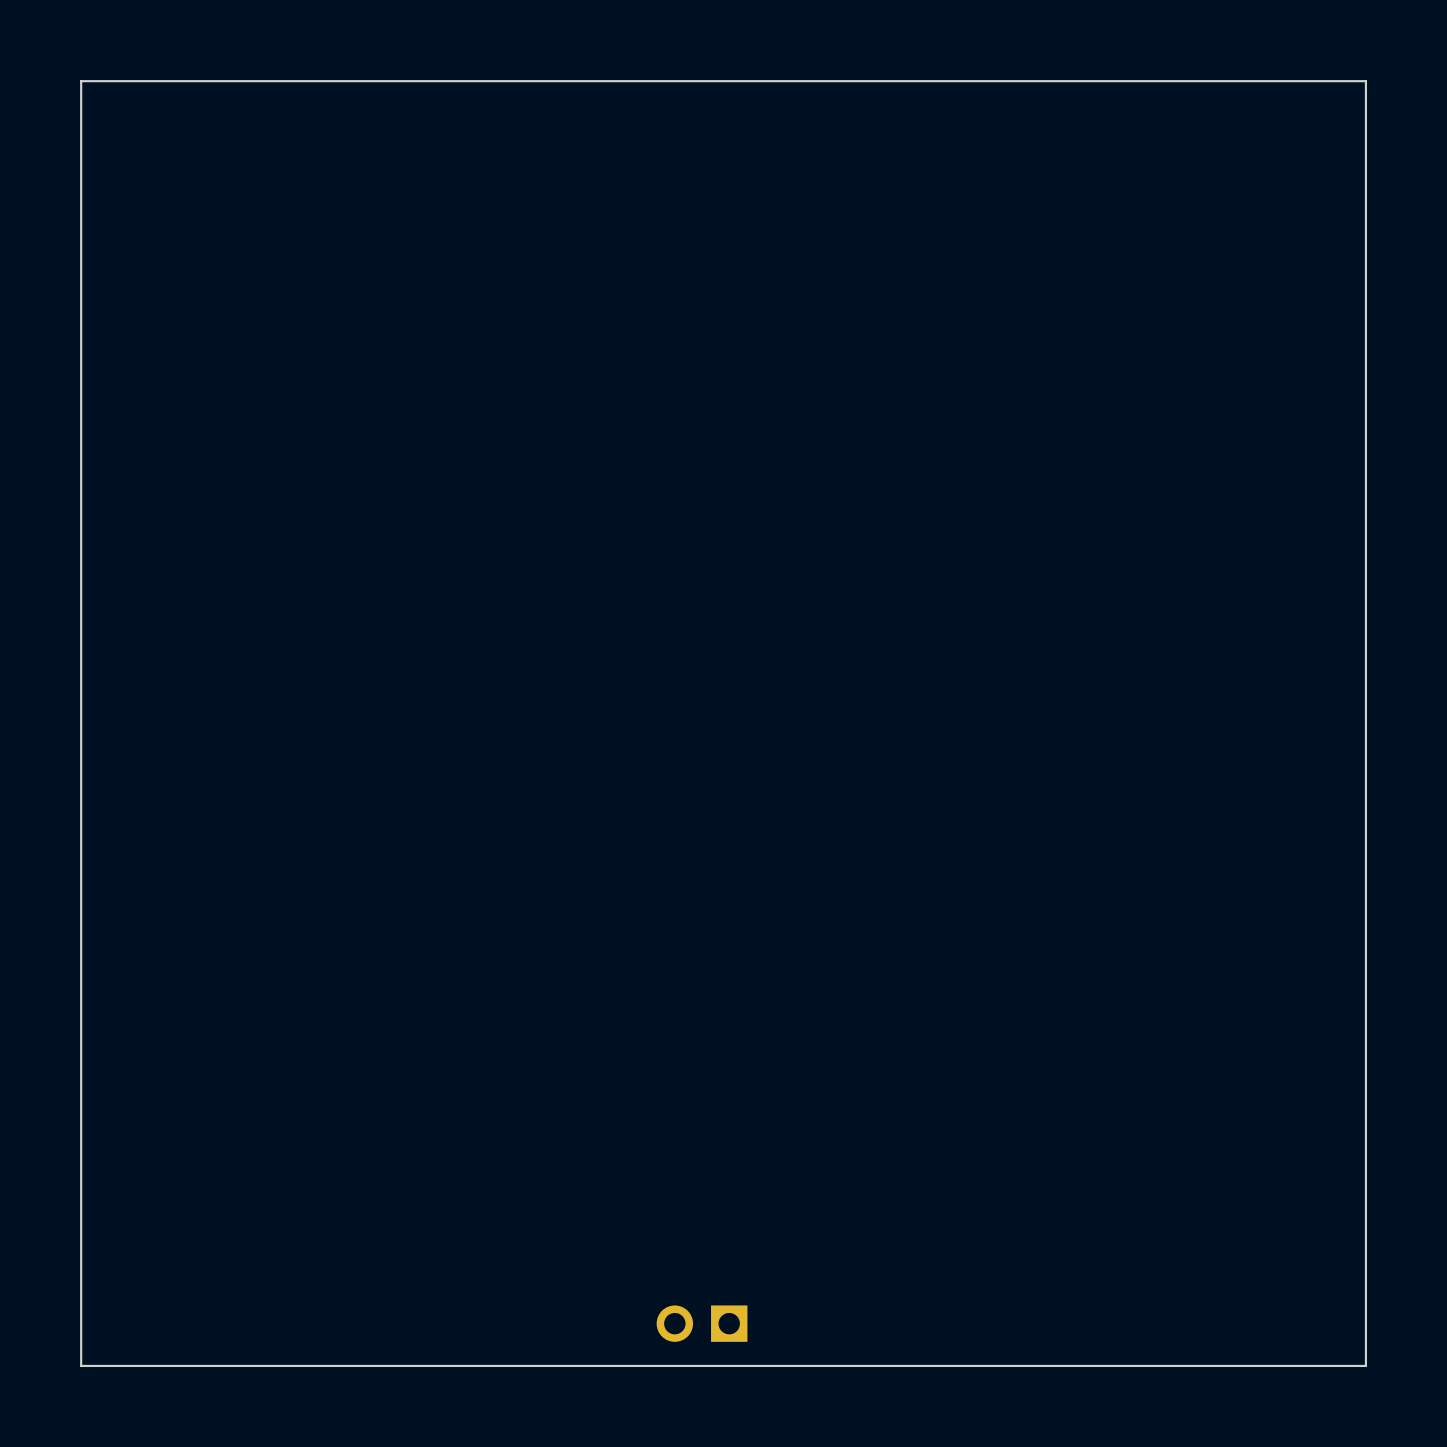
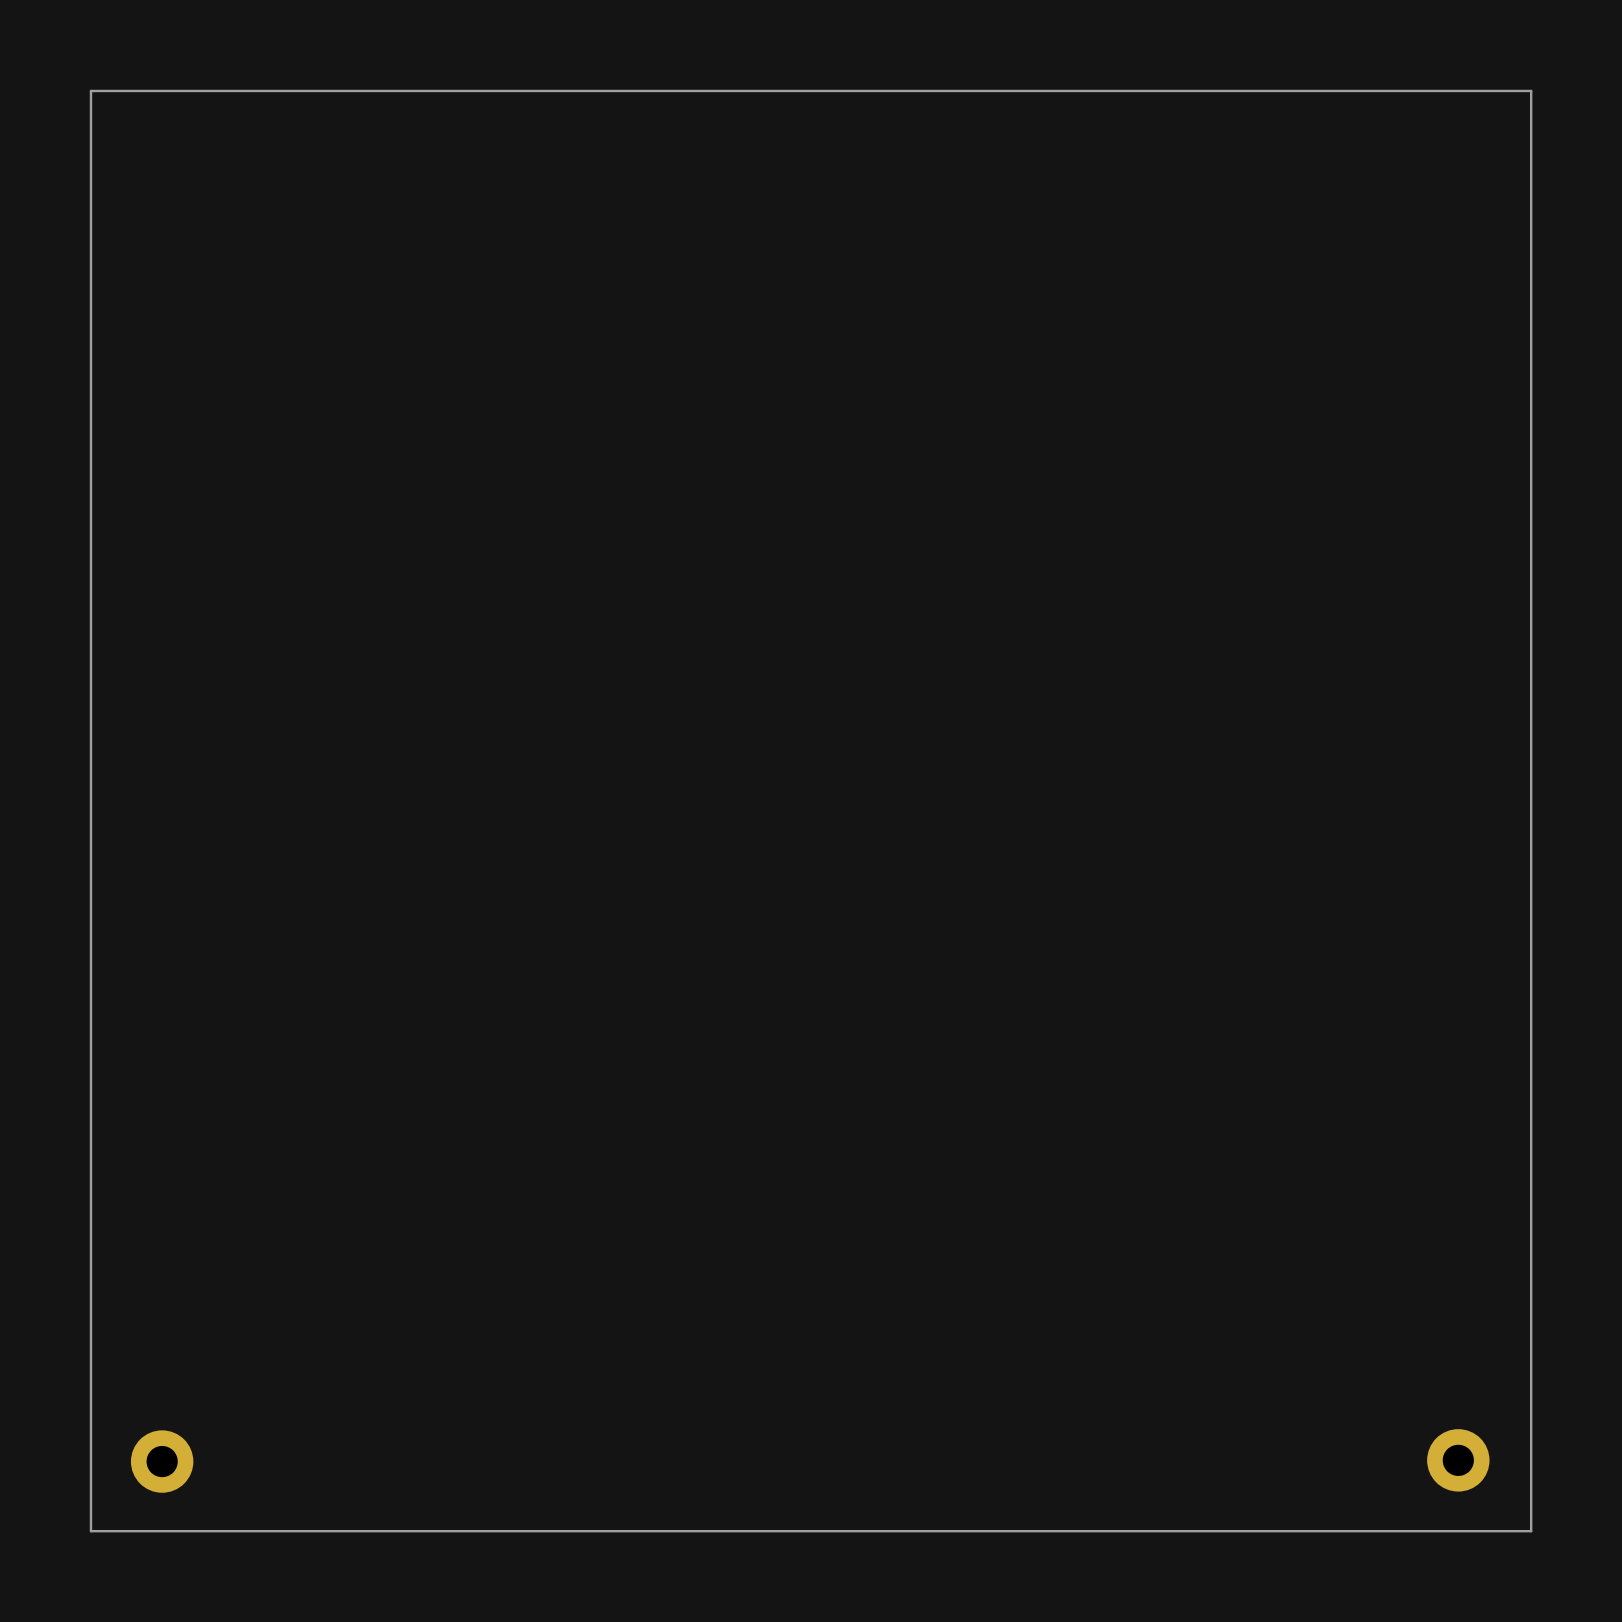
part: none -> (1458, 1460)
part: none -> (162, 1461)
part: (702, 1323) -> none

